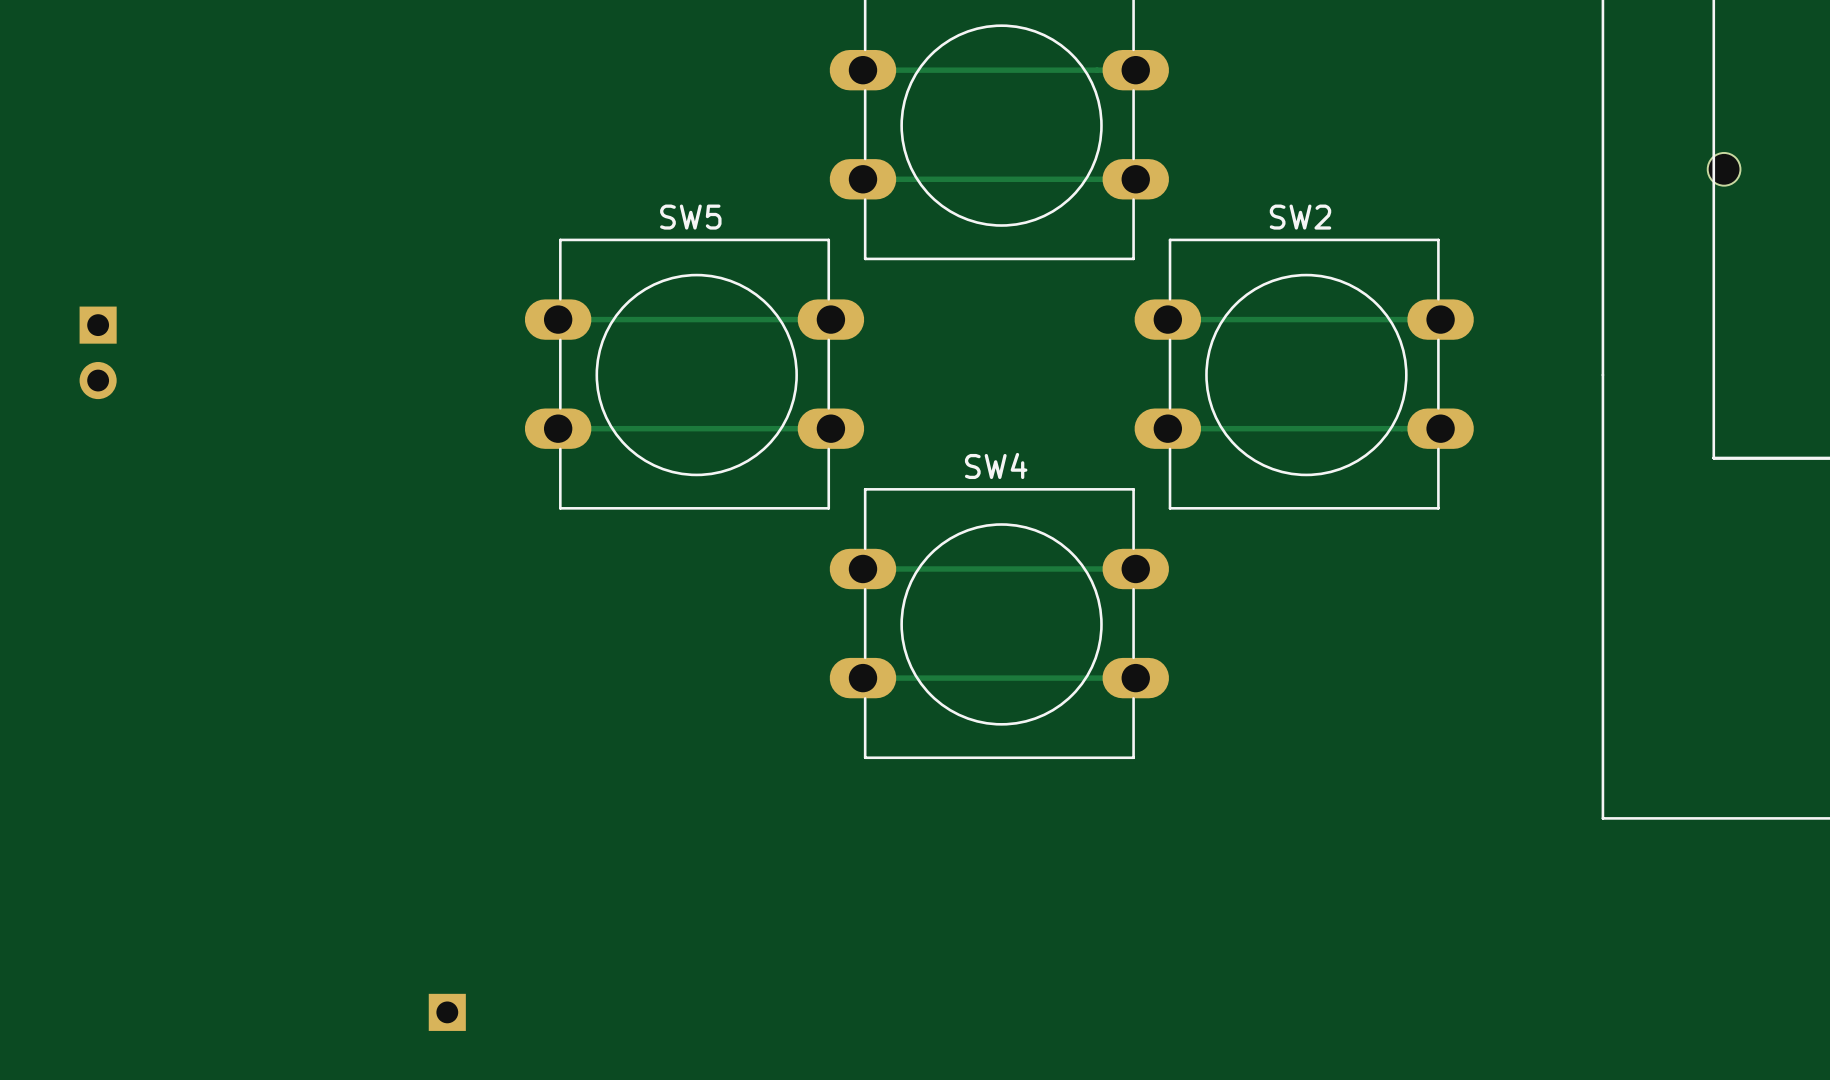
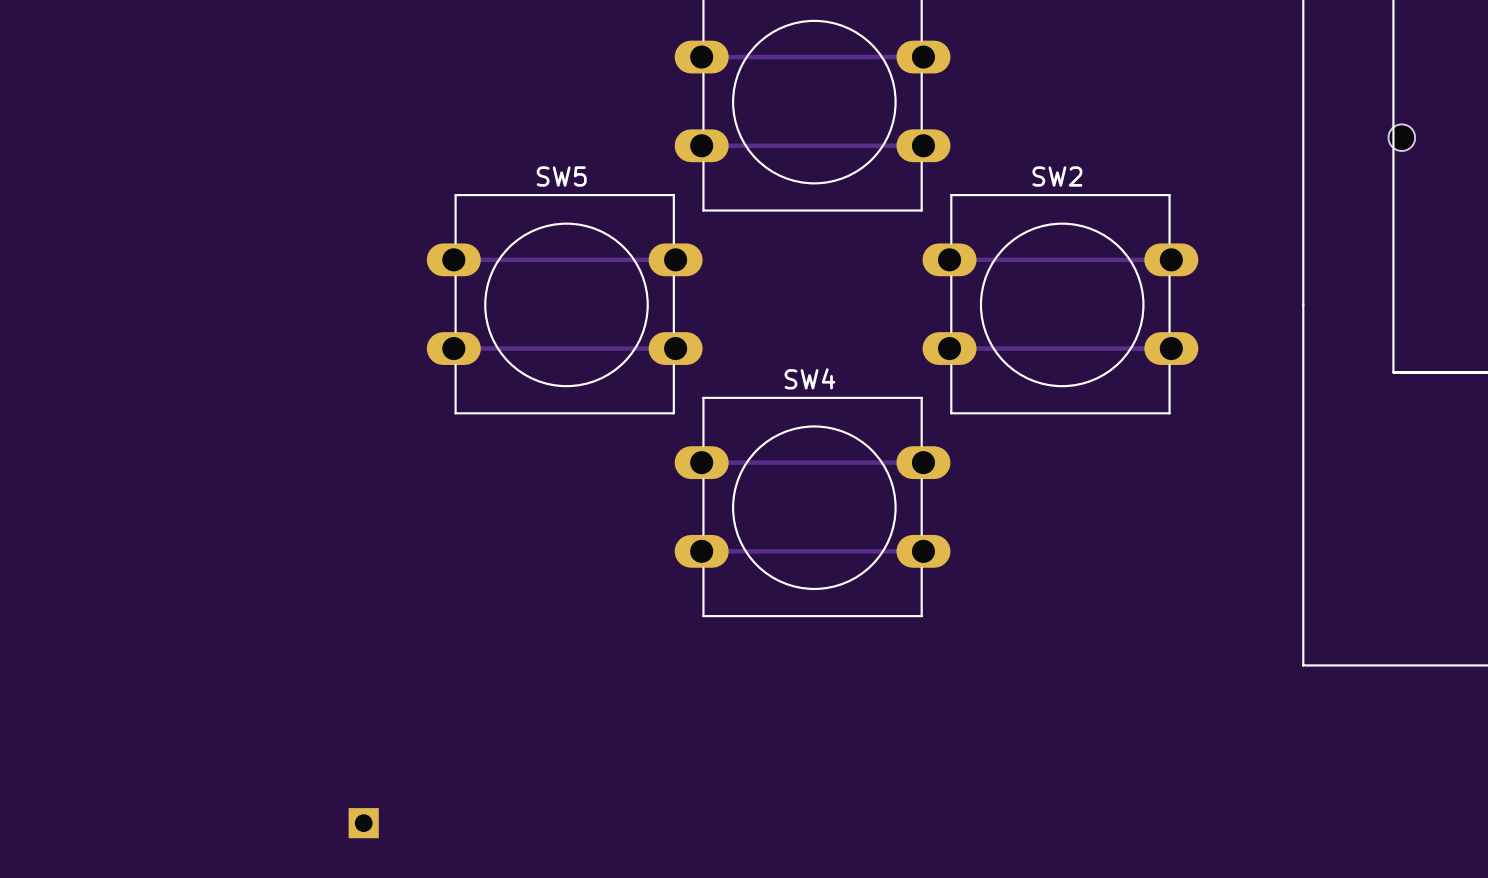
part: (98, 352) -> none

